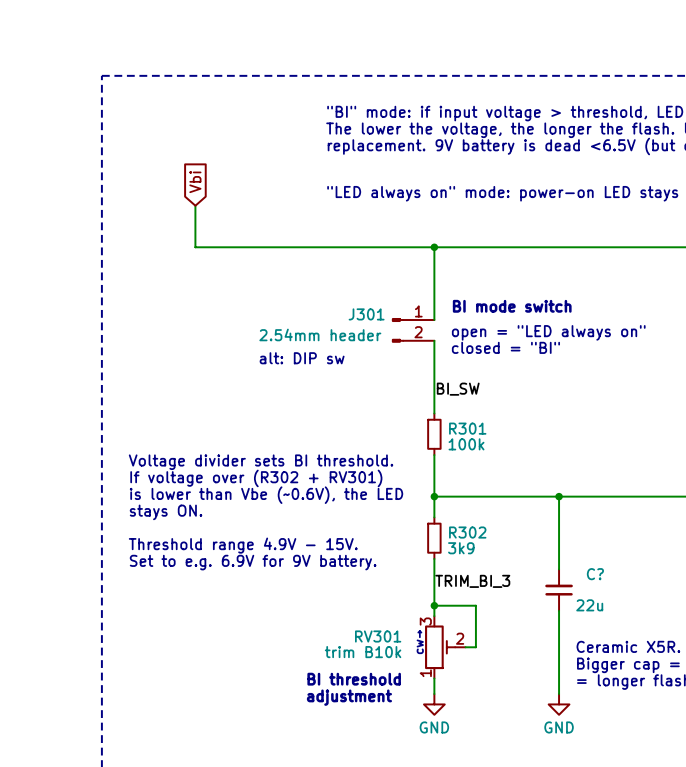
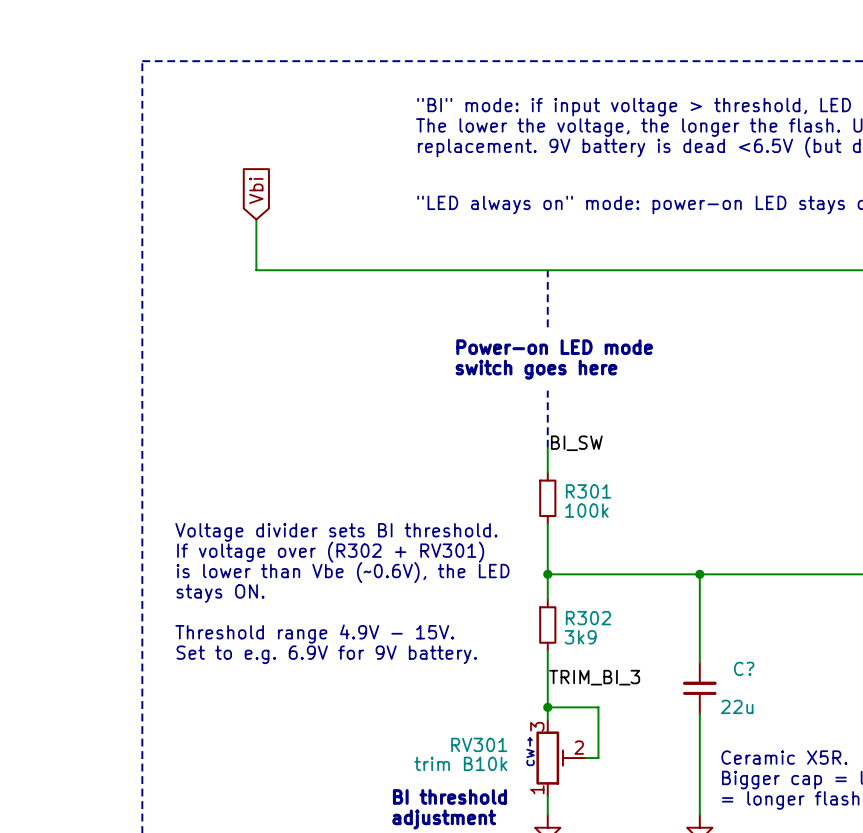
wire: (434, 247) (434, 320) -> none
line: none -> (547, 270) (547, 327)
junction: (434, 247) -> none
text: BI mode switch (512, 306) -> none
text: none -> Power-on LED mode (554, 347)
text: none -> switch goes here (536, 369)
J301: 2.54mm header (413, 330) -> none
text: open = "LED always on" (548, 332) -> none
line: none -> (547, 390) (547, 447)
text: closed = "BI" (505, 347) -> none
text: alt: DIP sw (302, 358) -> none

